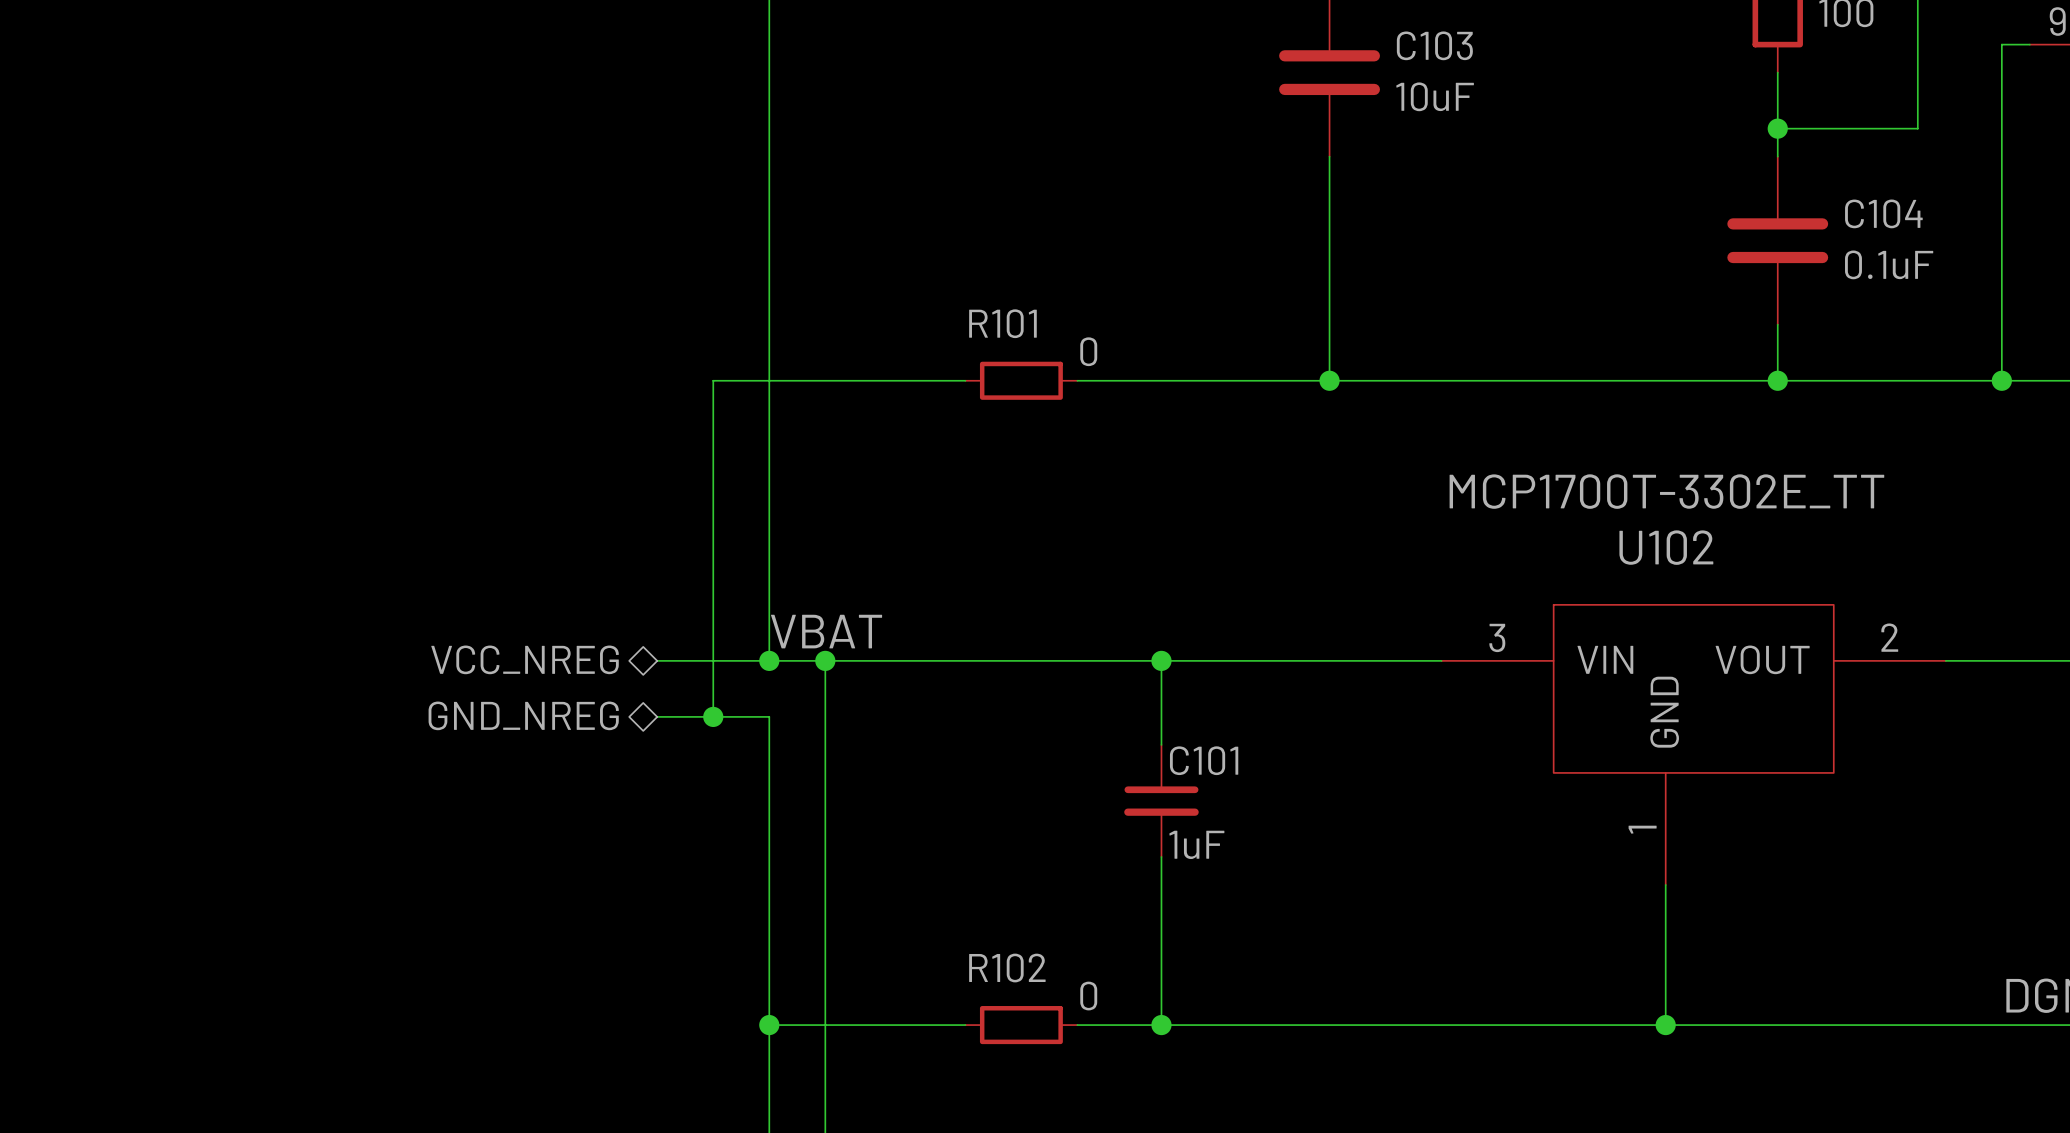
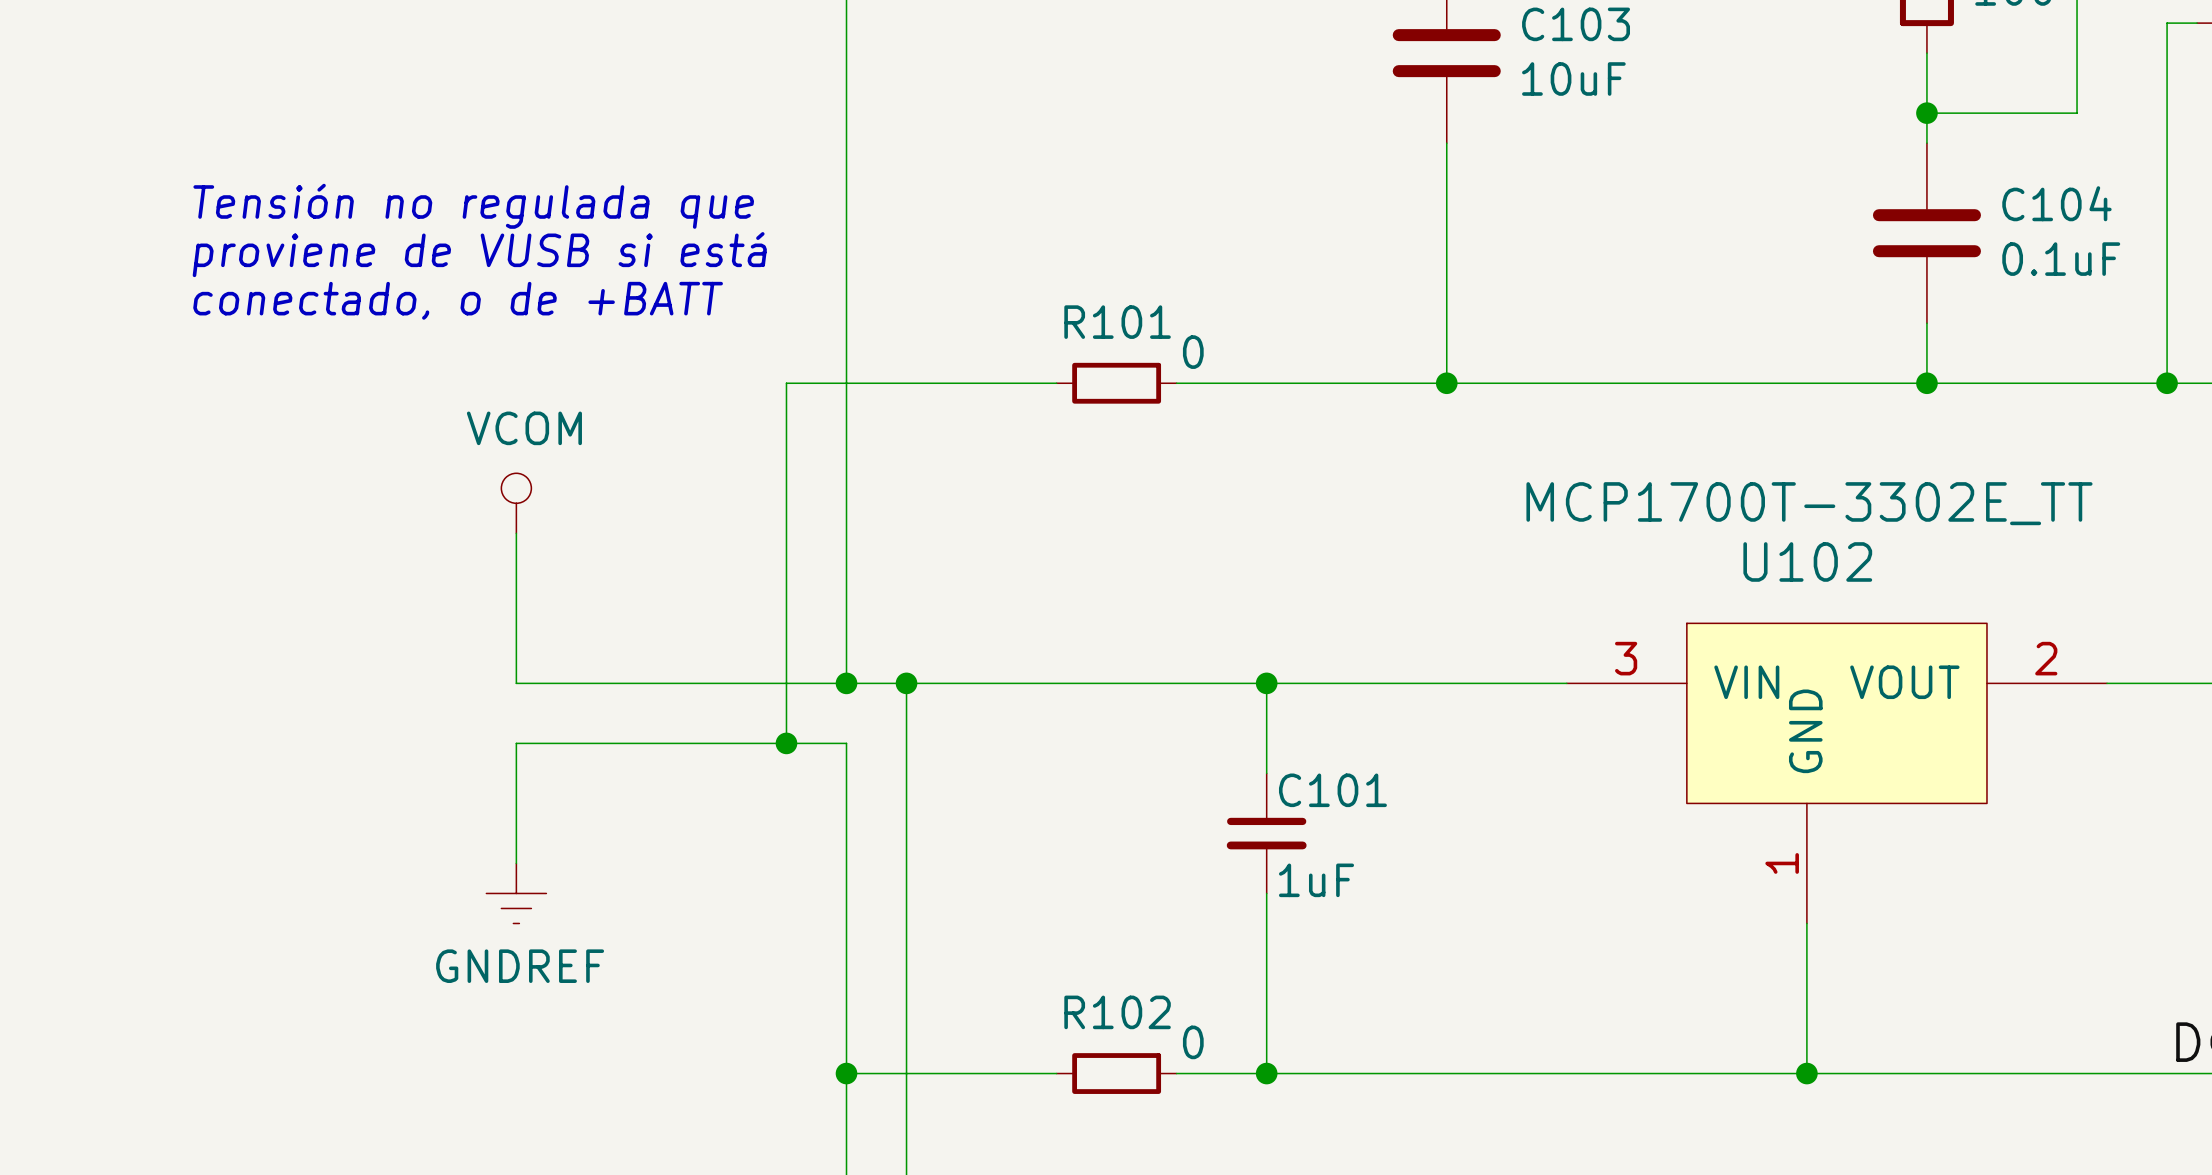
text: none -> Tensión no regulada que (473, 206)
text: none -> proviene de VUSB si está (479, 254)
text: none -> conectado, o de +BATT (458, 300)
power symbol: none -> VCOM (516, 503)
wire: none -> (516, 533) (516, 683) (726, 683)
label: VBAT (826, 631) -> none
hierarchical label: VCC_NREG (525, 659) -> none
hierarchical label: GND_NREG (523, 715) -> none
wire: none -> (726, 743) (516, 743) (516, 863)
power symbol: none -> GNDREF (516, 893)

